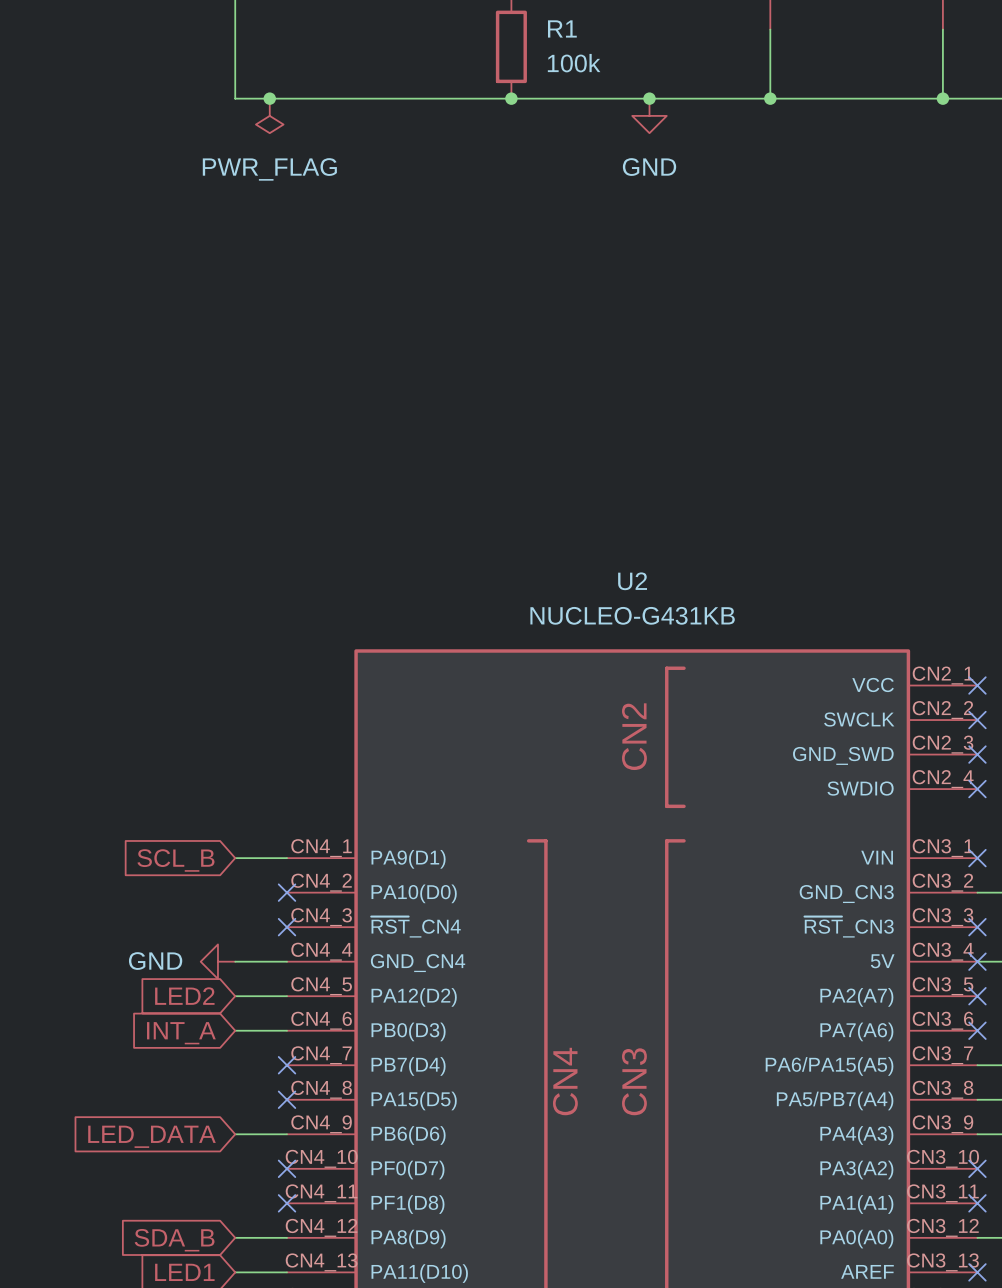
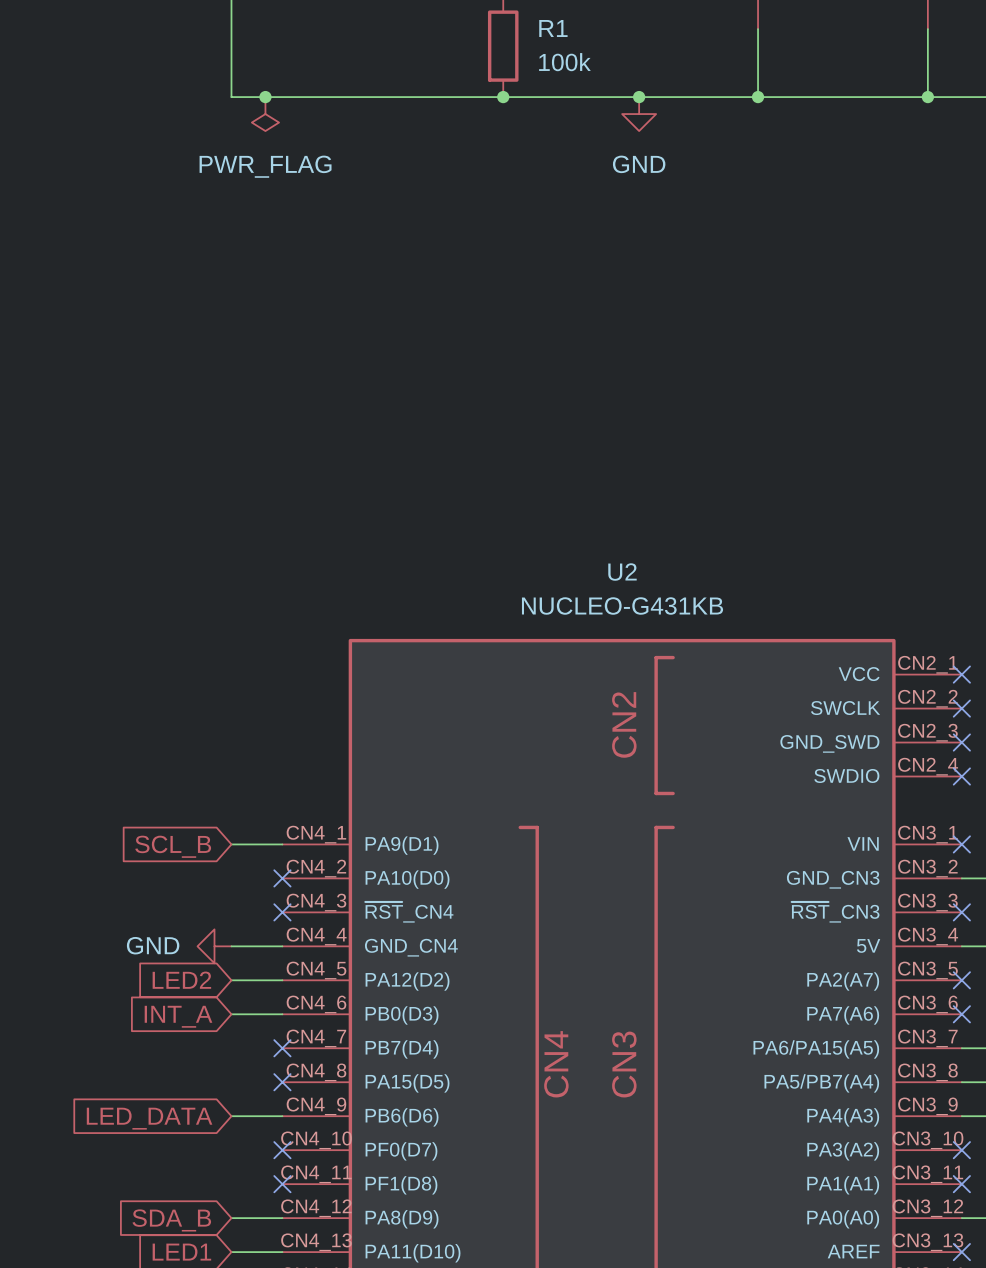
no-connect mark: (977, 961) -> none

